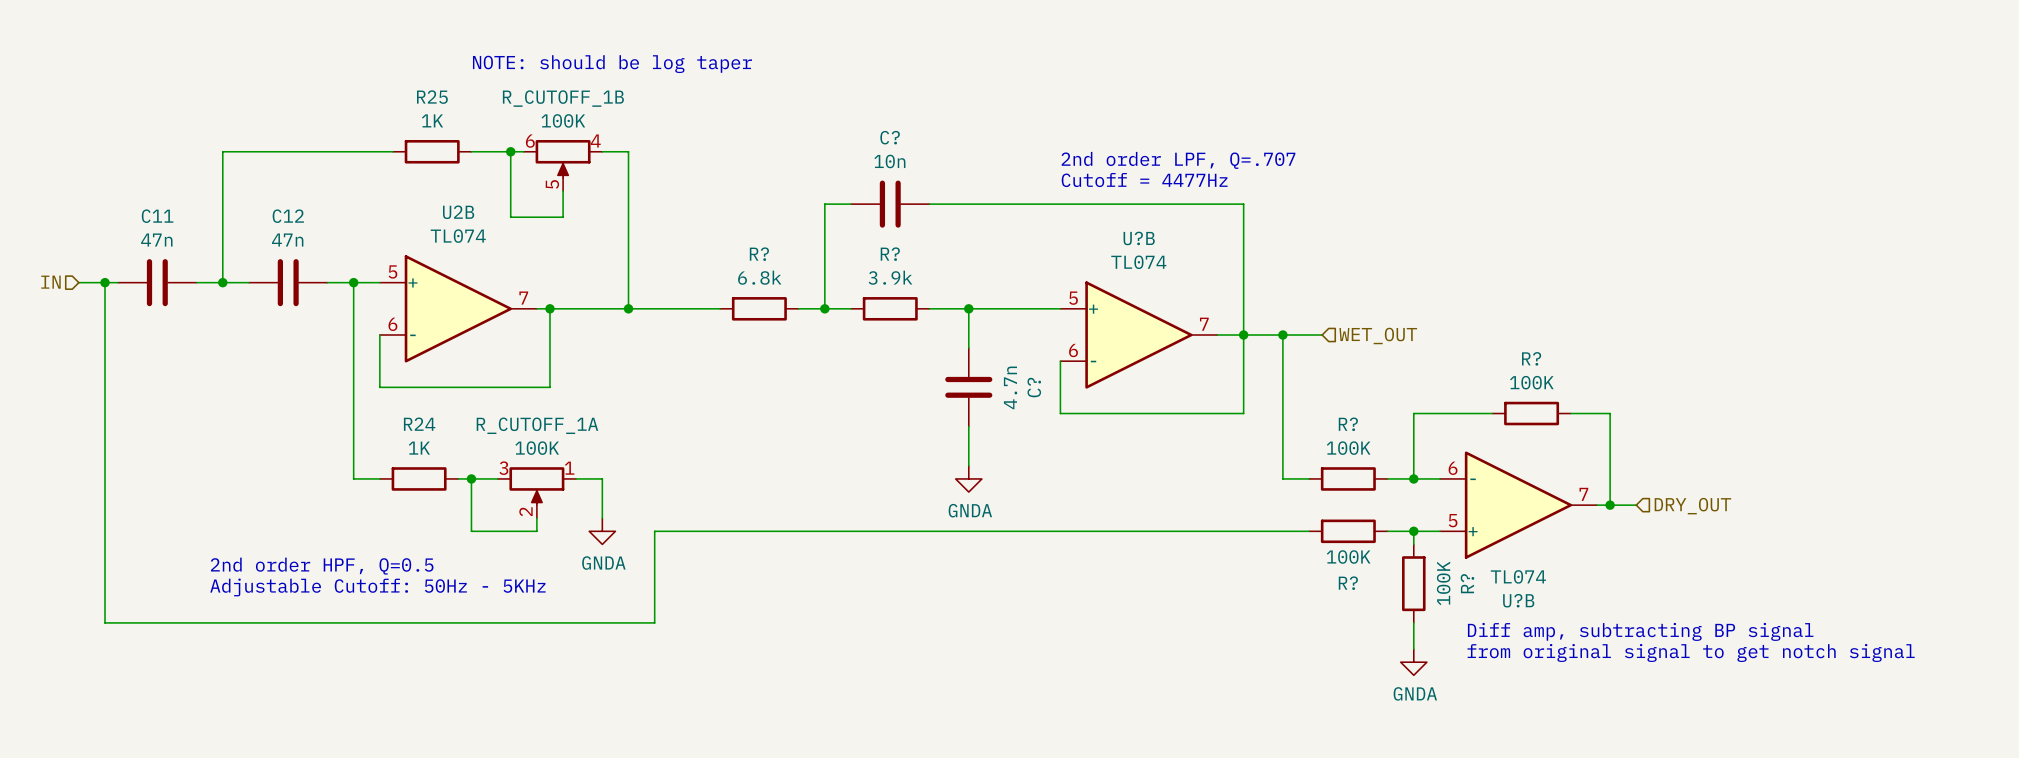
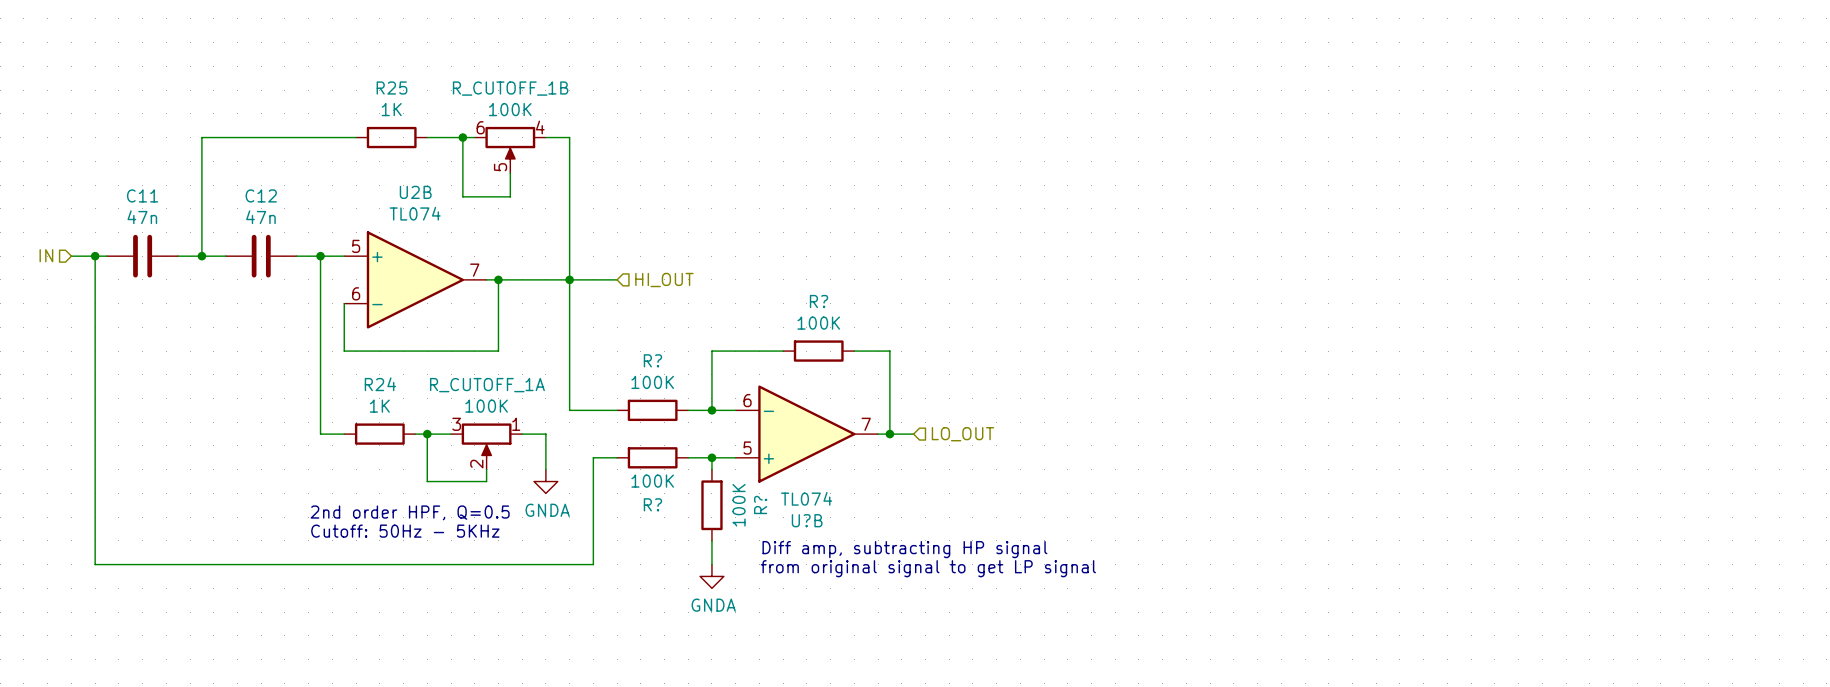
text: NOTE: should be log taper (612, 64) -> none
text: 2nd order LPF, Q=.707 (1178, 160) -> none
text: Cutoff = 4477Hz (1144, 180) -> none
wire: (851, 204) (824, 204) (824, 308) -> none
C?: 10n (890, 204) -> none
wire: (929, 204) (1243, 204) (1243, 413) (1060, 413) (1060, 361) -> none
wire: none -> (569, 279) (569, 410) (617, 410)
wire: (680, 308) (720, 308) -> none
R?: 6.8k (759, 308) -> none
wire: (798, 308) (851, 308) -> (688, 410) (735, 410)
junction: (824, 308) -> none
R?: 3.9k (890, 308) -> none
wire: (929, 308) (1060, 308) -> none
wire: (968, 308) (968, 348) -> none
junction: (968, 308) -> none
hierarchical label: none -> HI_OUT (664, 280)
U?B: TL074 (1138, 335) -> none
wire: (1217, 335) (1322, 335) -> none
junction: (1243, 335) -> none
wire: (1282, 335) (1282, 478) (1309, 478) -> none
junction: (1282, 335) -> none
hierarchical label: WET_OUT (1378, 335) -> none
wire: none -> (783, 351) (711, 351) (711, 410)
R?: none -> 100K (818, 351)
wire: none -> (854, 351) (889, 351) (889, 434)
C?: 4.7n (968, 387) -> none
wire: (1492, 413) (1413, 413) (1413, 478) -> none
R?: 100K (1531, 413) -> none
wire: (1570, 413) (1610, 413) (1610, 505) -> none
wire: (968, 426) (968, 465) -> none
R?: none -> 100K (652, 410)
junction: none -> (711, 410)
U?B: none -> TL074 (806, 434)
wire: none -> (878, 434) (913, 434)
power symbol position: GNDA (968, 478) -> GNDA (711, 576)
junction: none -> (889, 434)
R?: 100K (1348, 478) -> none
wire: (1387, 478) (1439, 478) -> none
junction: (1413, 478) -> none
hierarchical label: none -> LO_OUT (962, 434)
R?: none -> 100K (652, 457)
wire: none -> (688, 457) (735, 457)
wire: none -> (711, 457) (711, 469)
junction: none -> (711, 457)
U?B: TL074 (1518, 505) -> none
wire: (1597, 505) (1636, 505) -> none
junction: (1610, 505) -> none
hierarchical label: DRY_OUT (1692, 506) -> none
wire: (654, 531) (1309, 531) -> (593, 481) (593, 457) (617, 457)
R?: 100K (1348, 531) -> none
wire: (1387, 531) (1439, 531) -> none
wire: (1413, 531) (1413, 544) -> none
junction: (1413, 531) -> none
R?: none -> 100K (711, 505)
text position: 2nd order HPF, Q=0.5 (322, 566) -> 2nd order HPF, Q=0.5 (410, 512)
R?: 100K (1413, 583) -> none
text: Adjustable Cutoff: 50Hz - 5KHz (377, 587) -> Cutoff: 50Hz - 5KHz (405, 531)
wire: none -> (711, 540) (711, 564)
text: none -> Diff amp, subtracting HP signal (904, 549)
wire: (1413, 622) (1413, 649) -> none
text: none -> from original signal to get LP signal (928, 568)
text: Diff amp, subtracting BP signal (1640, 631) -> none
text: from original signal to get notch signal (1691, 652) -> none
power symbol: GNDA (1413, 662) -> none

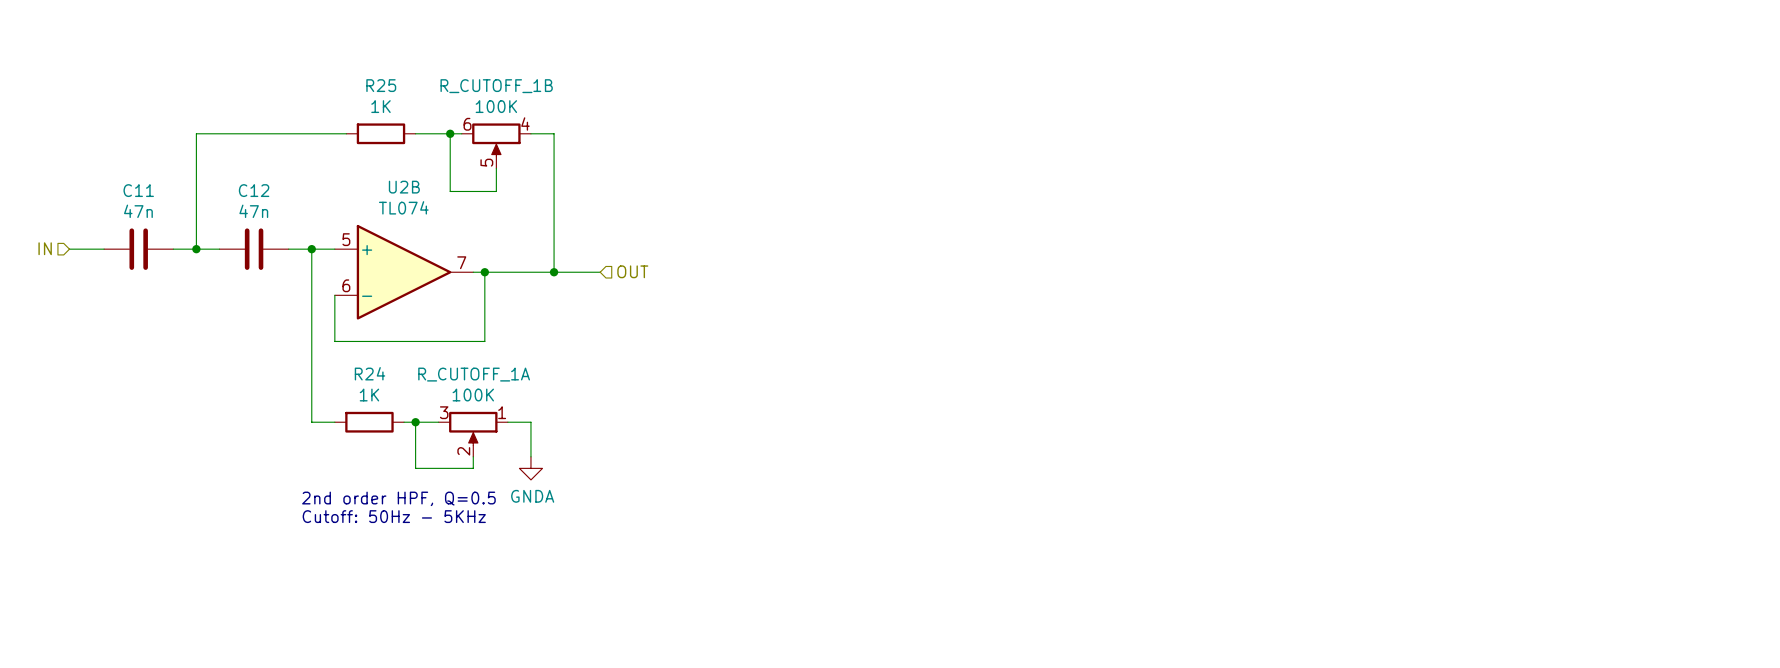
wire: (95, 256) (95, 564) (593, 564) (593, 457) (617, 457) -> none
junction: (95, 256) -> none
wire: (569, 279) (569, 410) (617, 410) -> none
hierarchical label: HI_OUT (664, 280) -> OUT (632, 271)
wire: (783, 351) (711, 351) (711, 410) -> none
R?: 100K (818, 351) -> none
wire: (854, 351) (889, 351) (889, 434) -> none
R?: 100K (652, 410) -> none
wire: (688, 410) (735, 410) -> none
junction: (711, 410) -> none
U?B: TL074 (806, 434) -> none
wire: (878, 434) (913, 434) -> none
junction: (889, 434) -> none
hierarchical label: LO_OUT (962, 434) -> none
R?: 100K (652, 457) -> none
wire: (688, 457) (735, 457) -> none
wire: (711, 457) (711, 469) -> none
junction: (711, 457) -> none
R?: 100K (711, 505) -> none
wire: (711, 540) (711, 564) -> none
text: Diff amp, subtracting HP signal (904, 549) -> none
text: from original signal to get LP signal (928, 568) -> none
power symbol: GNDA (711, 576) -> none

